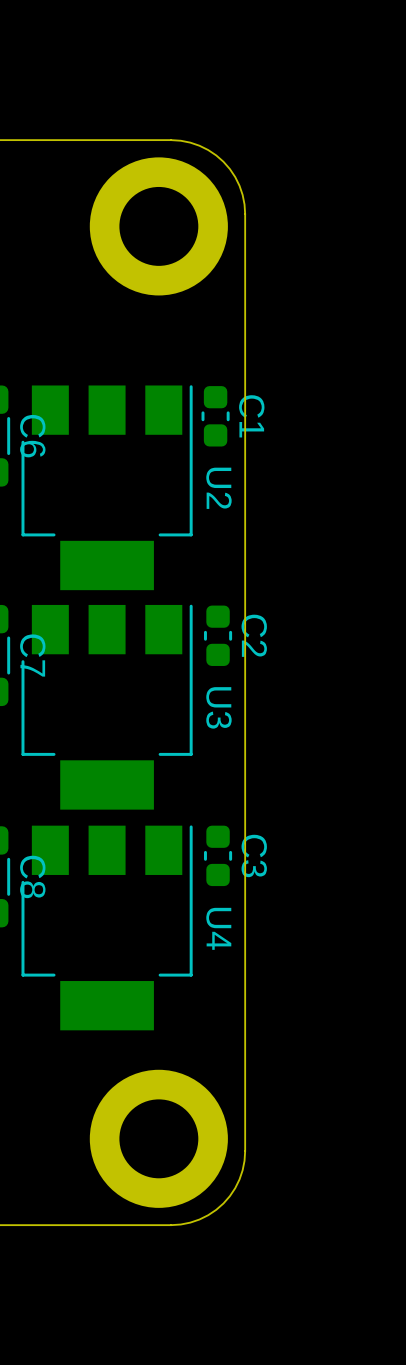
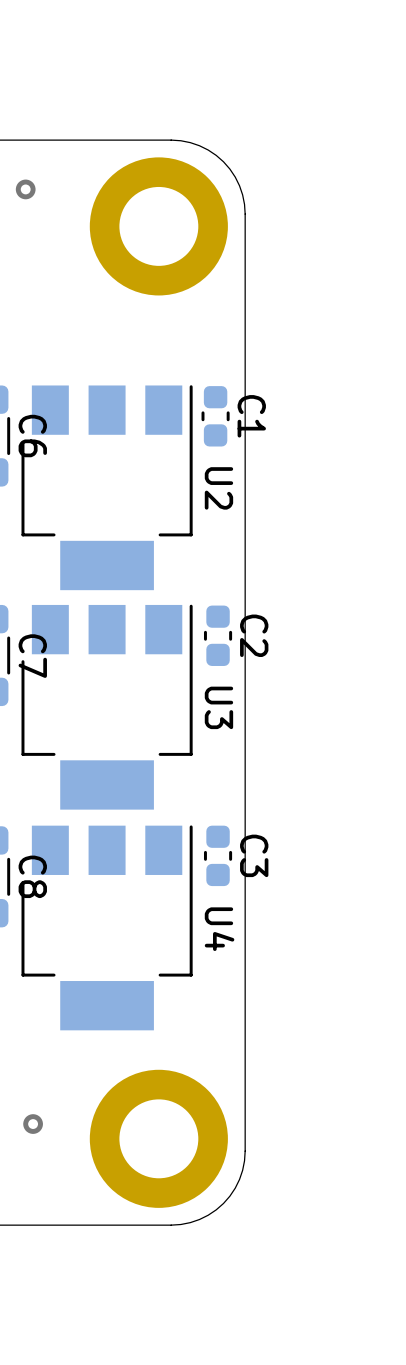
via: none -> (25, 189)
via: none -> (33, 1124)

